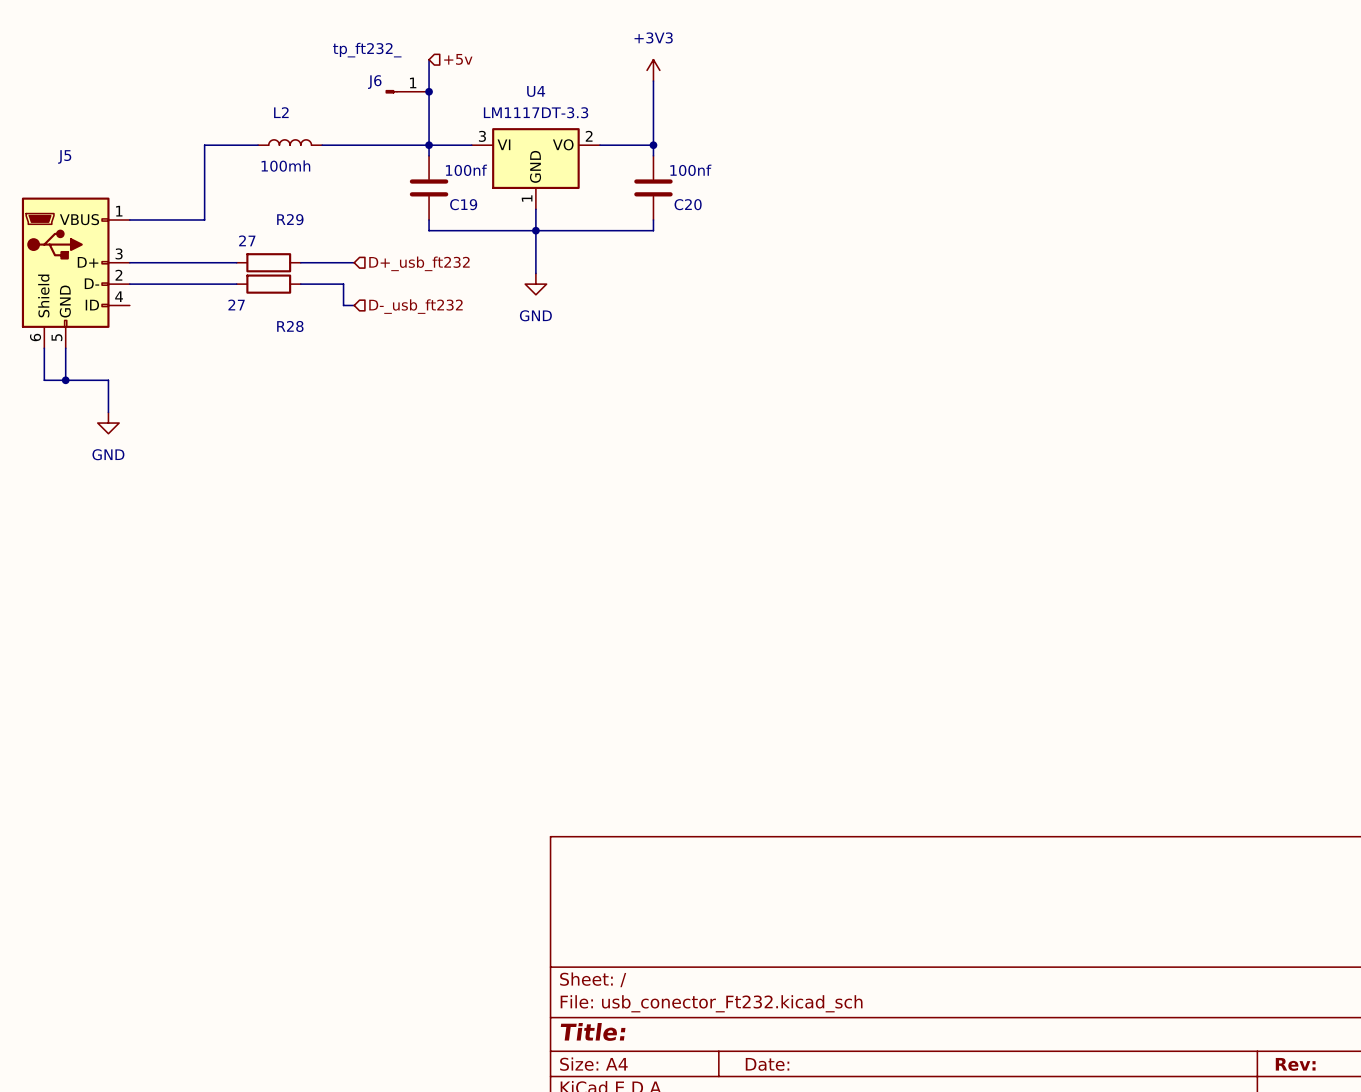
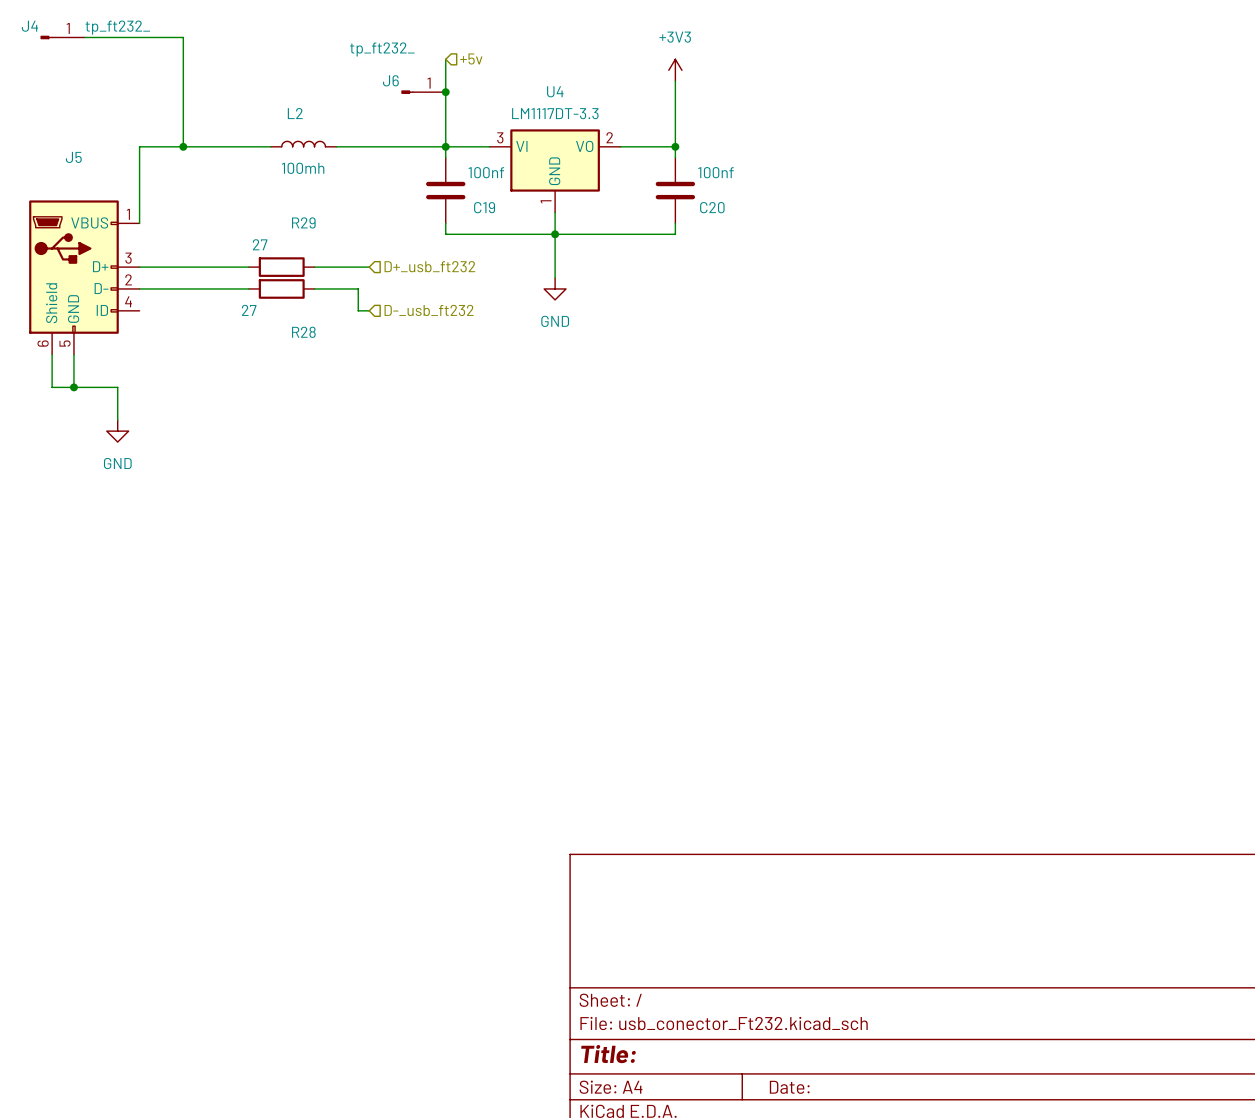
J4: none -> tp_ft232_ (62, 37)
wire: none -> (84, 37) (183, 37) (183, 146)
junction: none -> (183, 146)
wire: (204, 145) (204, 220) (129, 220) -> (216, 146) (139, 146) (139, 223)

